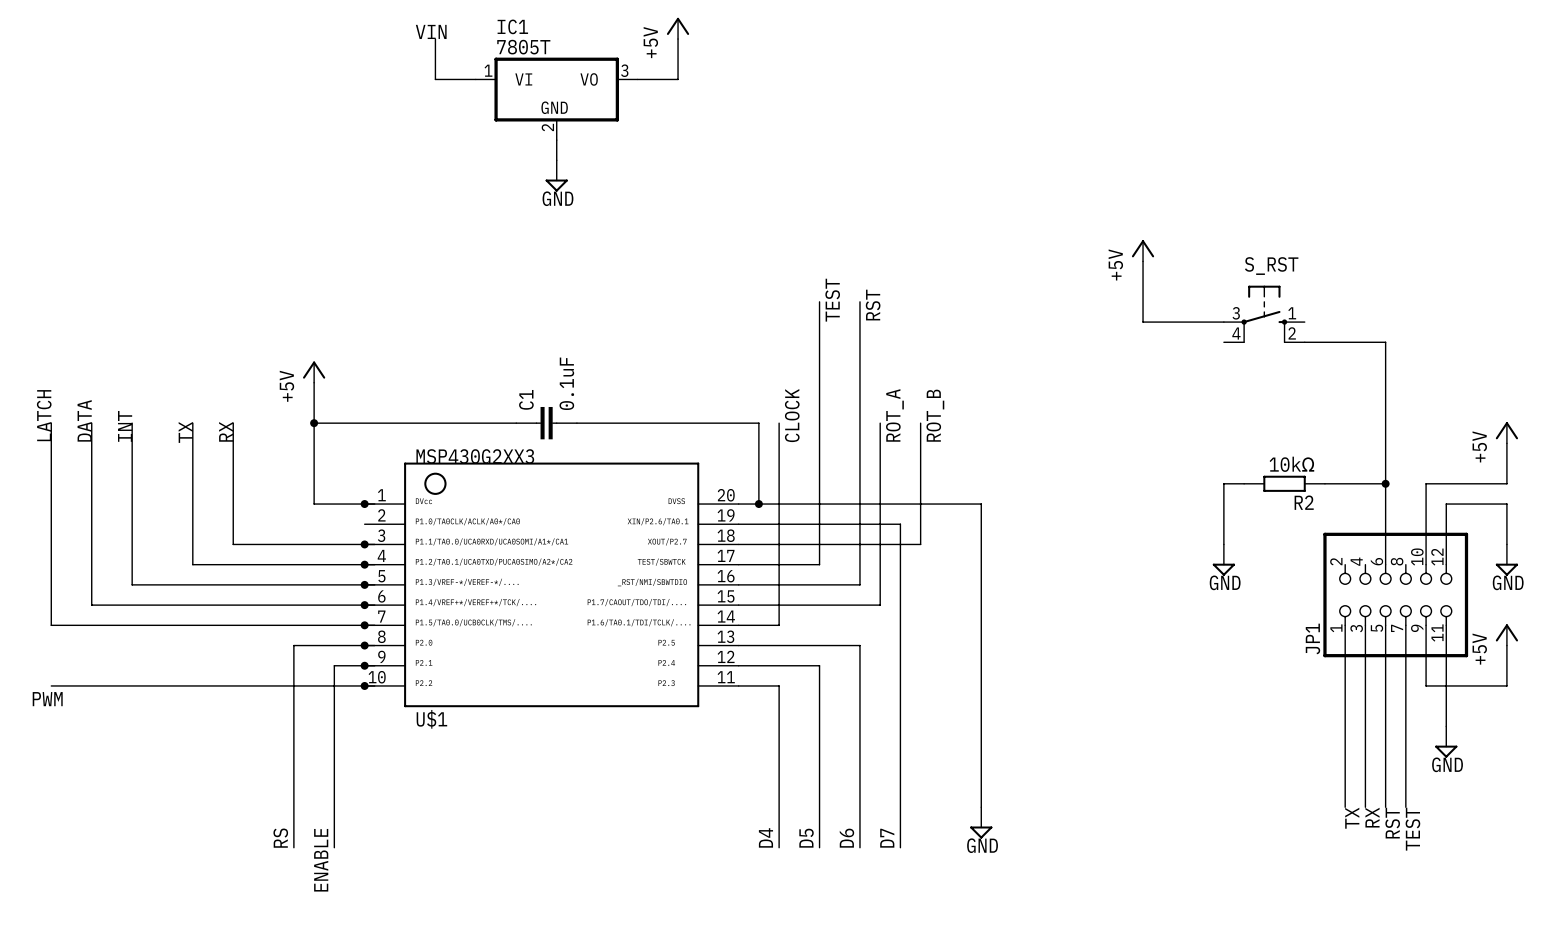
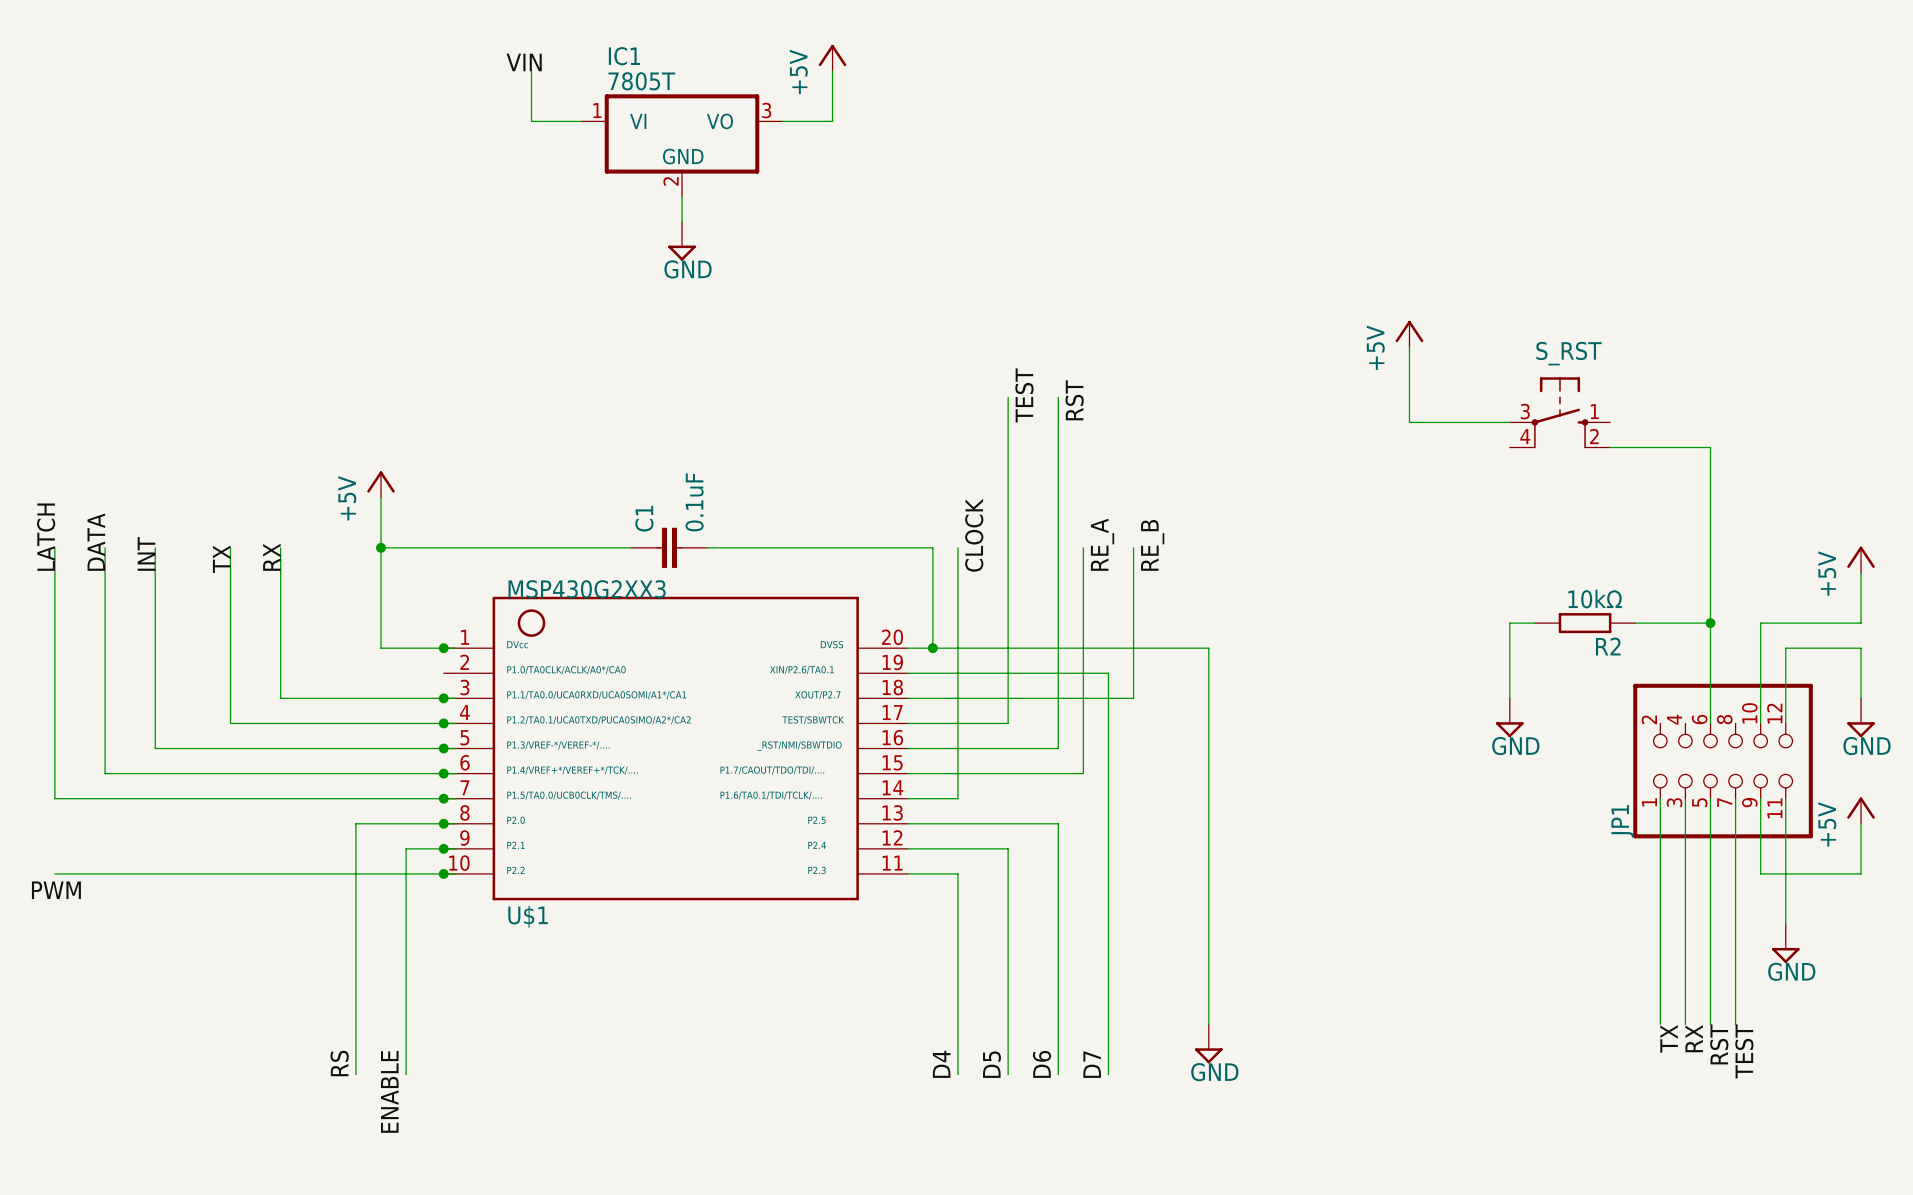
label: ROT_A (894, 415) -> RE_A (1102, 544)
label: ROT_B (935, 415) -> RE_B (1152, 545)

